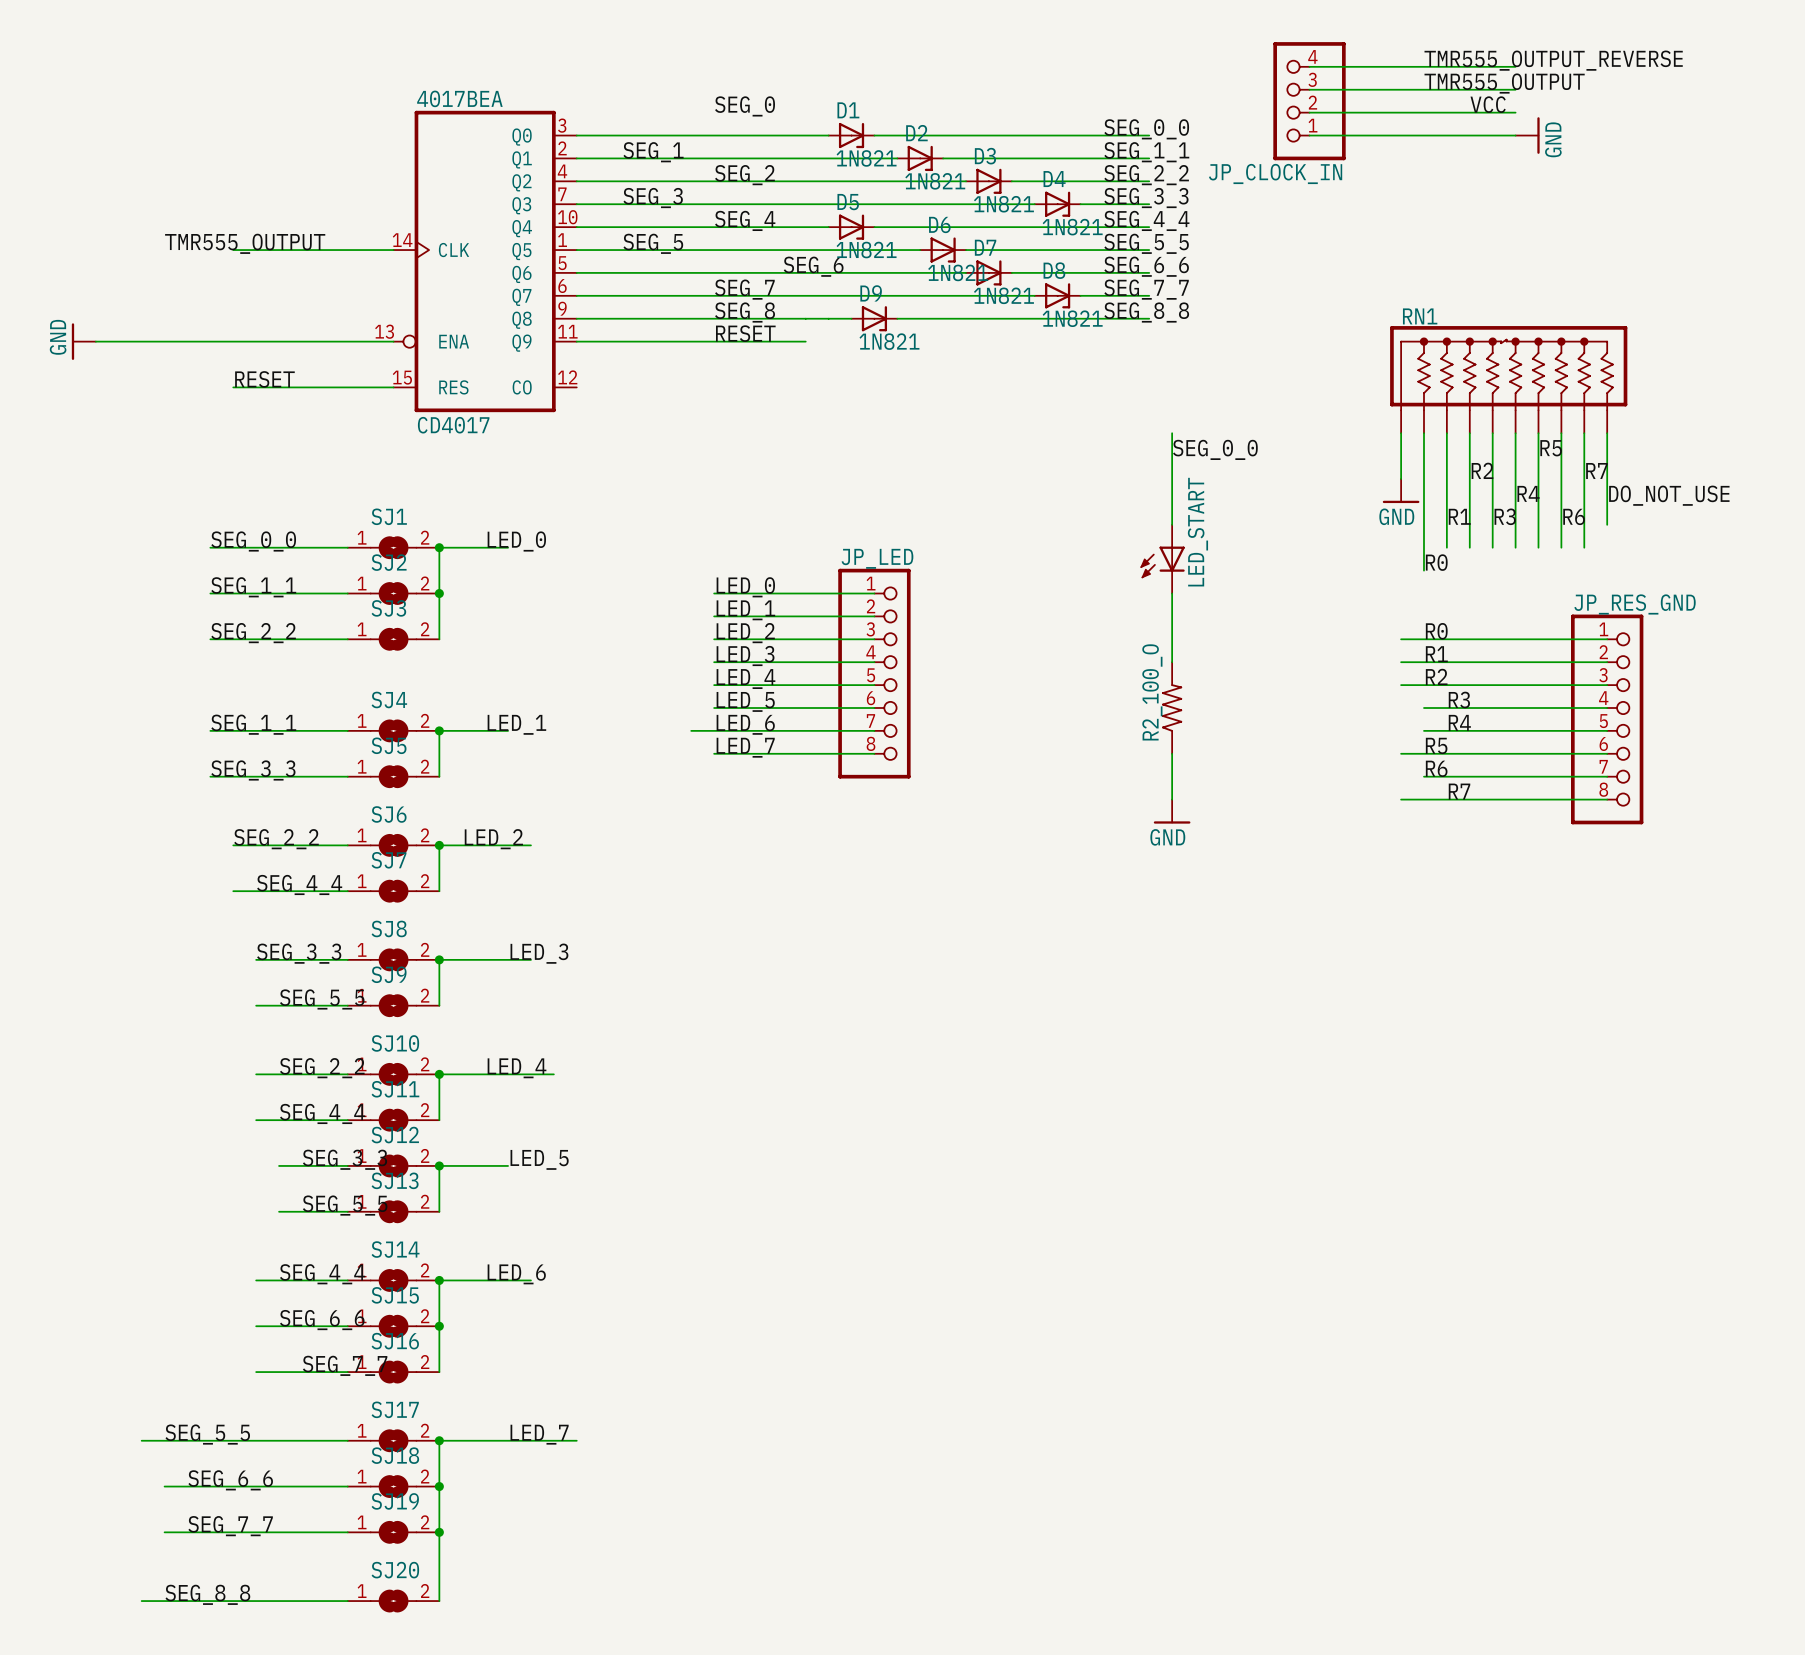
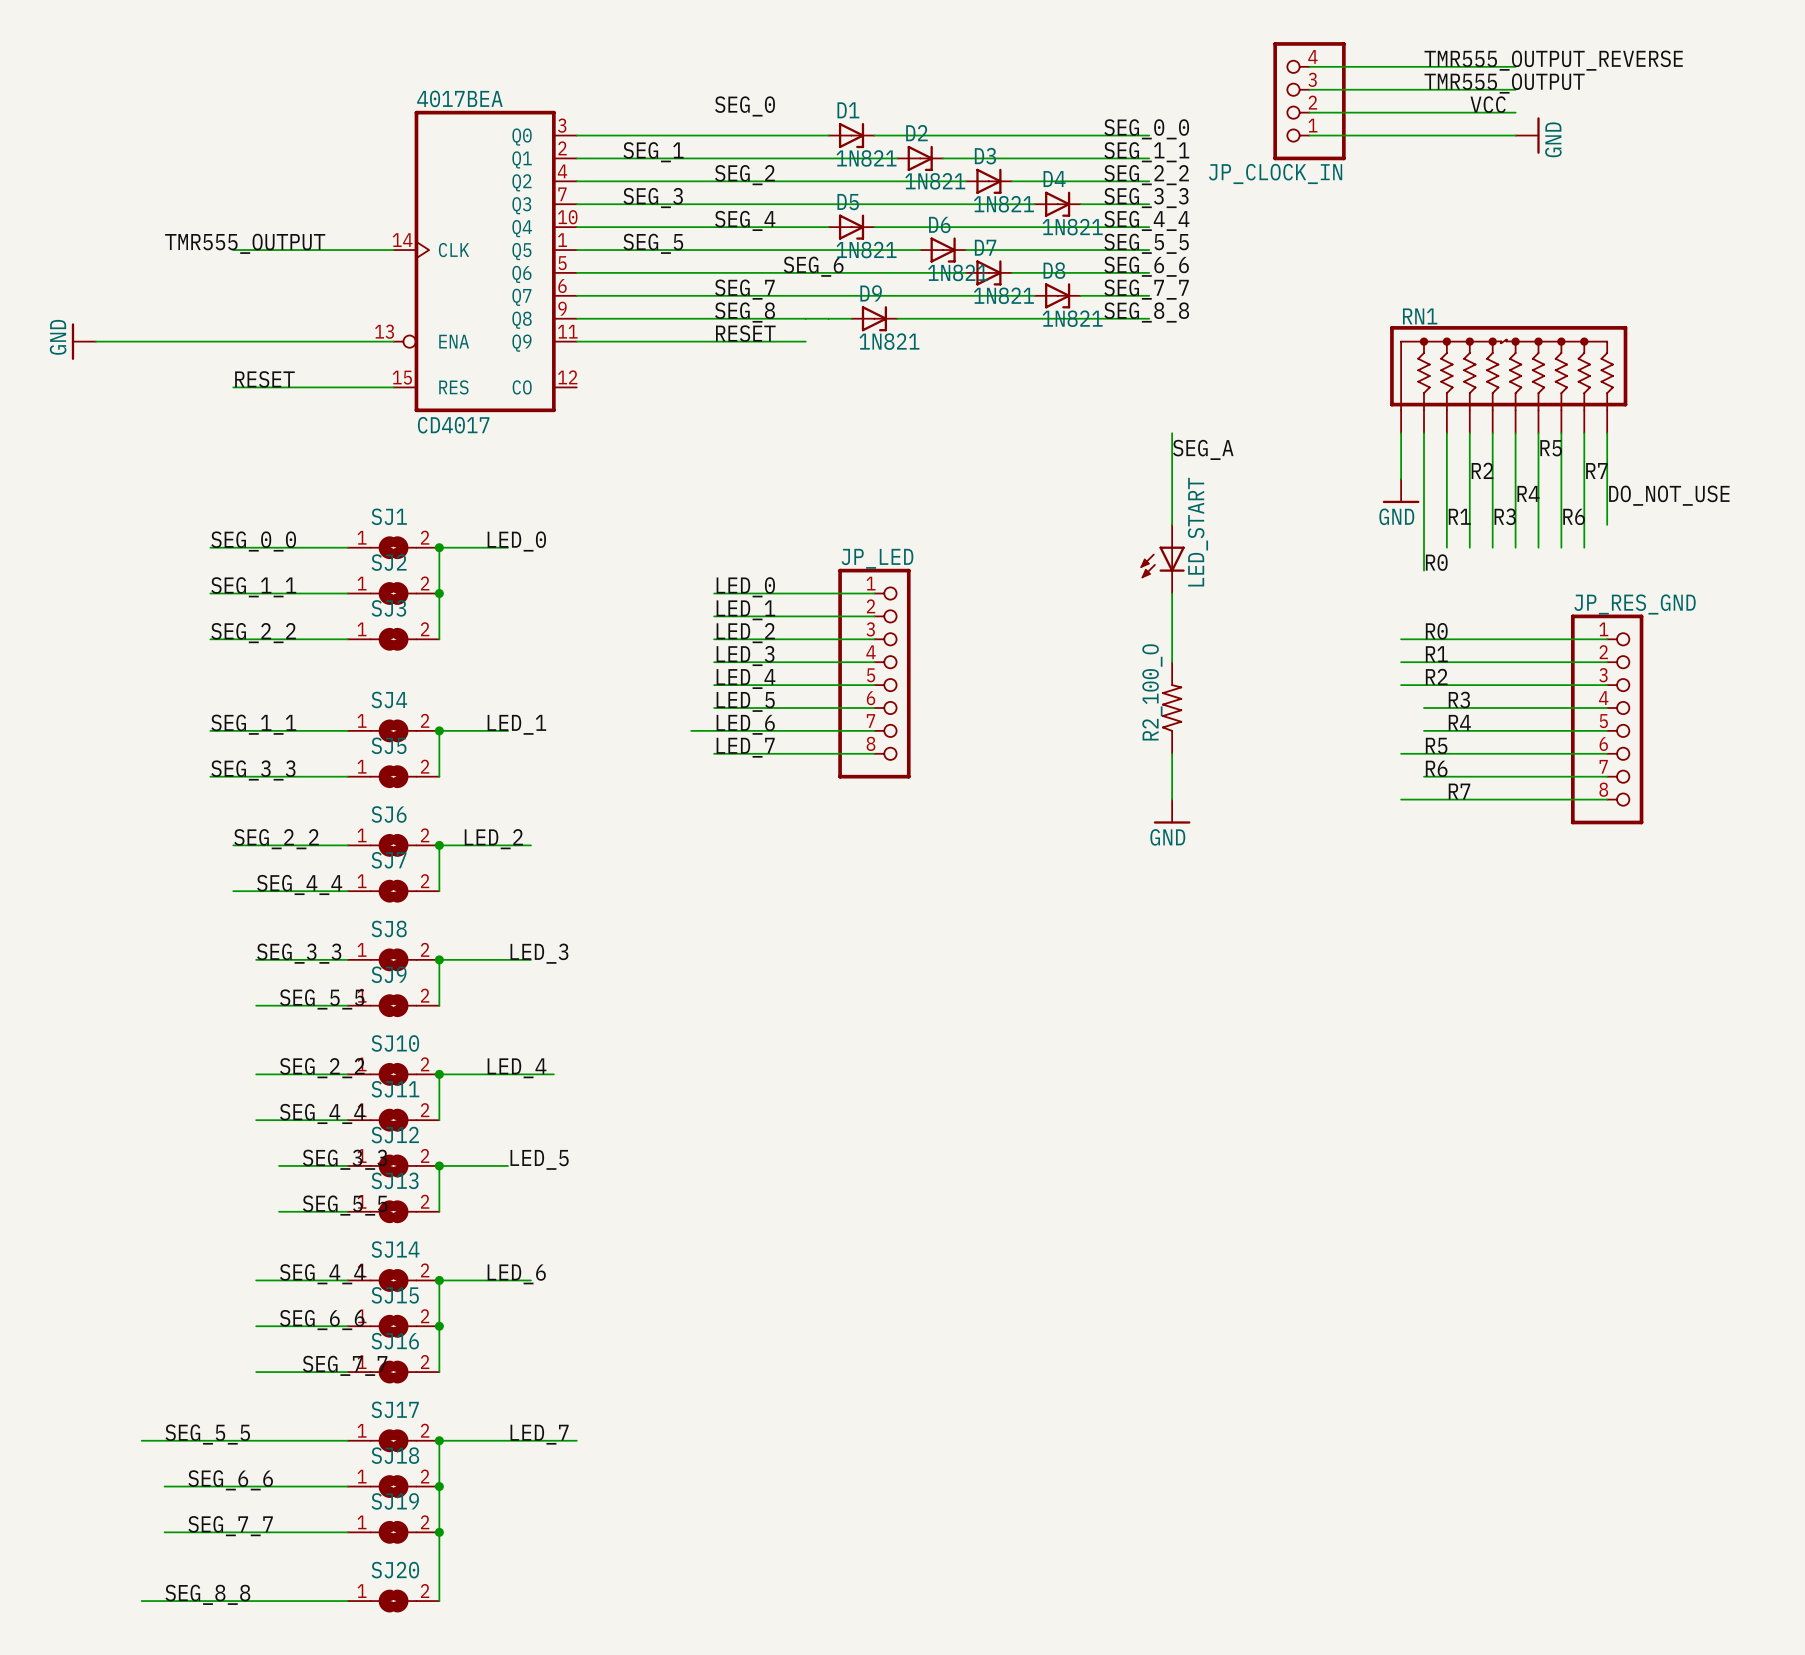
label: SEG_0_0 (1215, 449) -> SEG_A (1203, 449)

